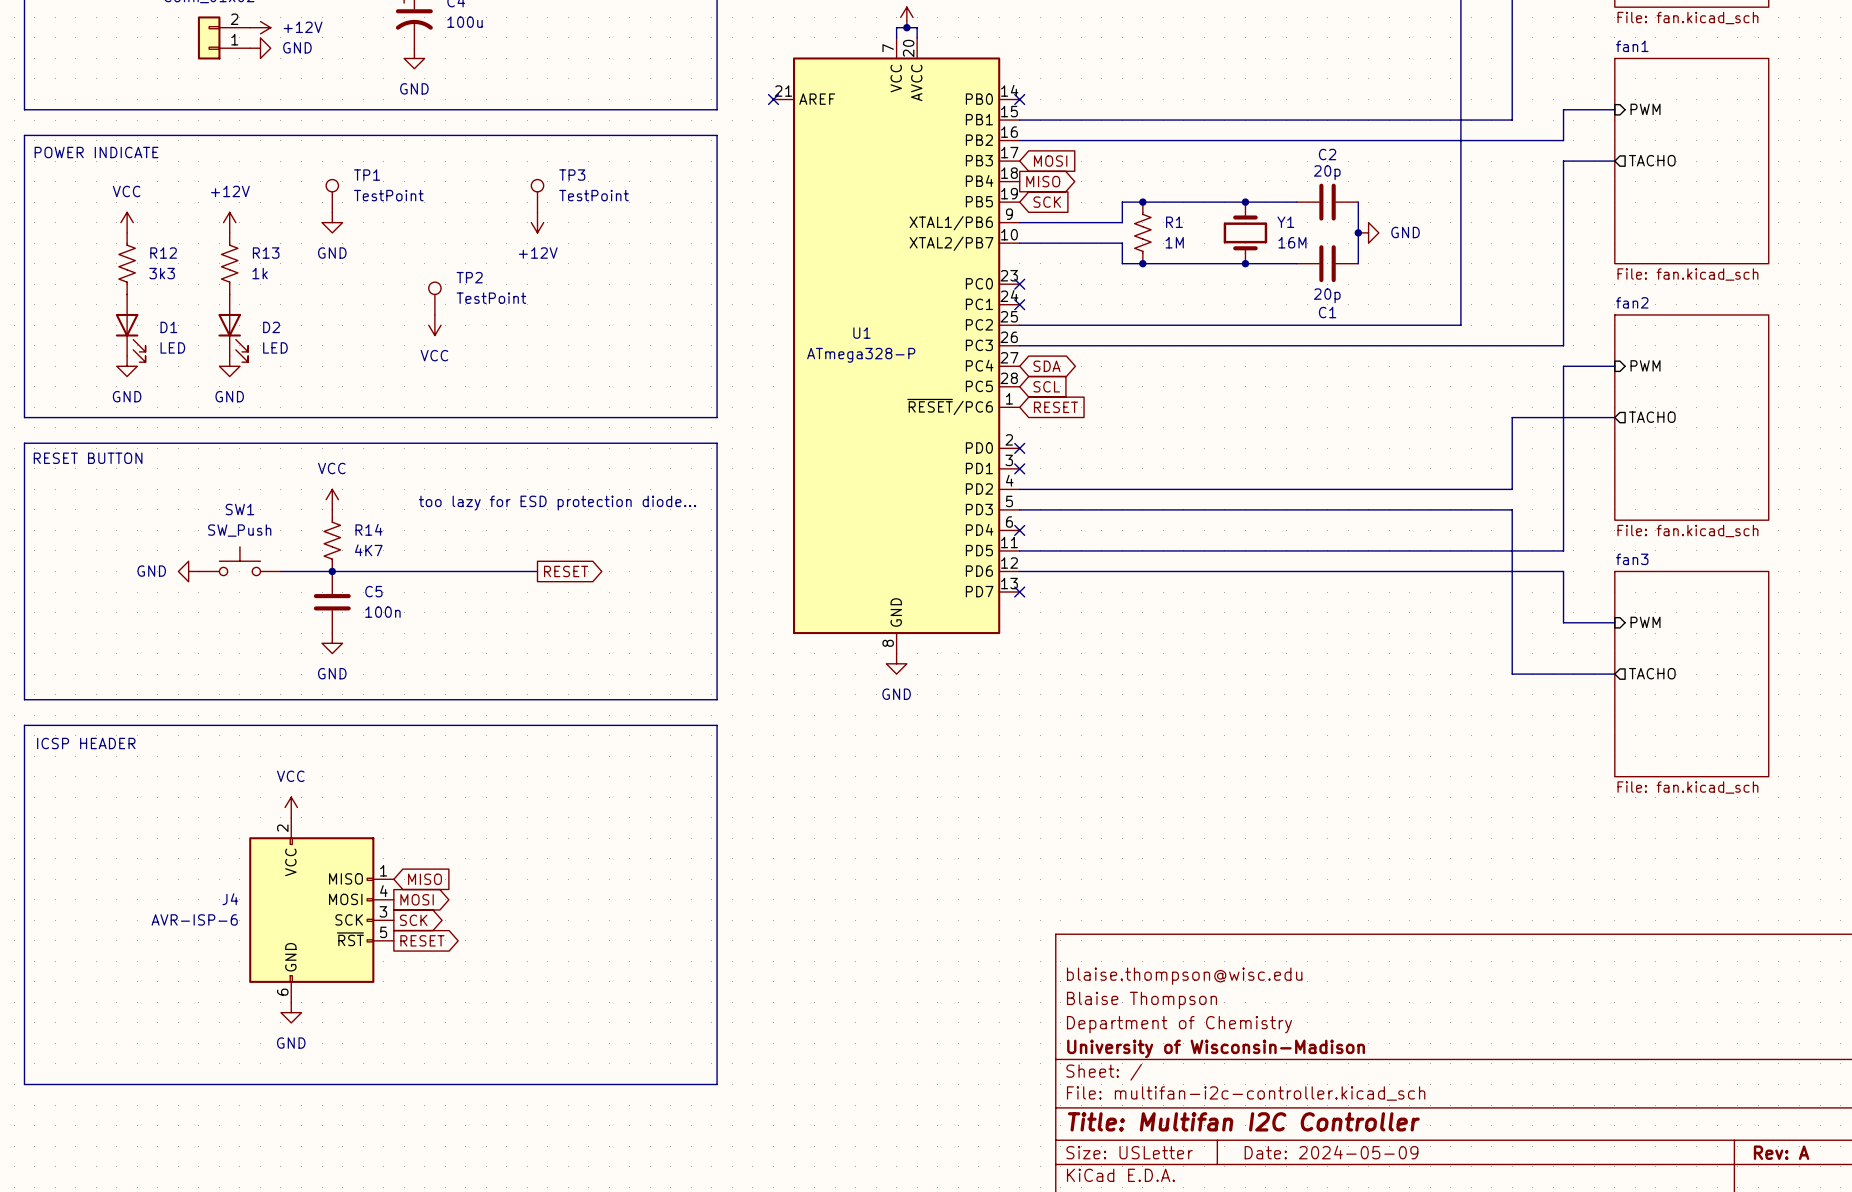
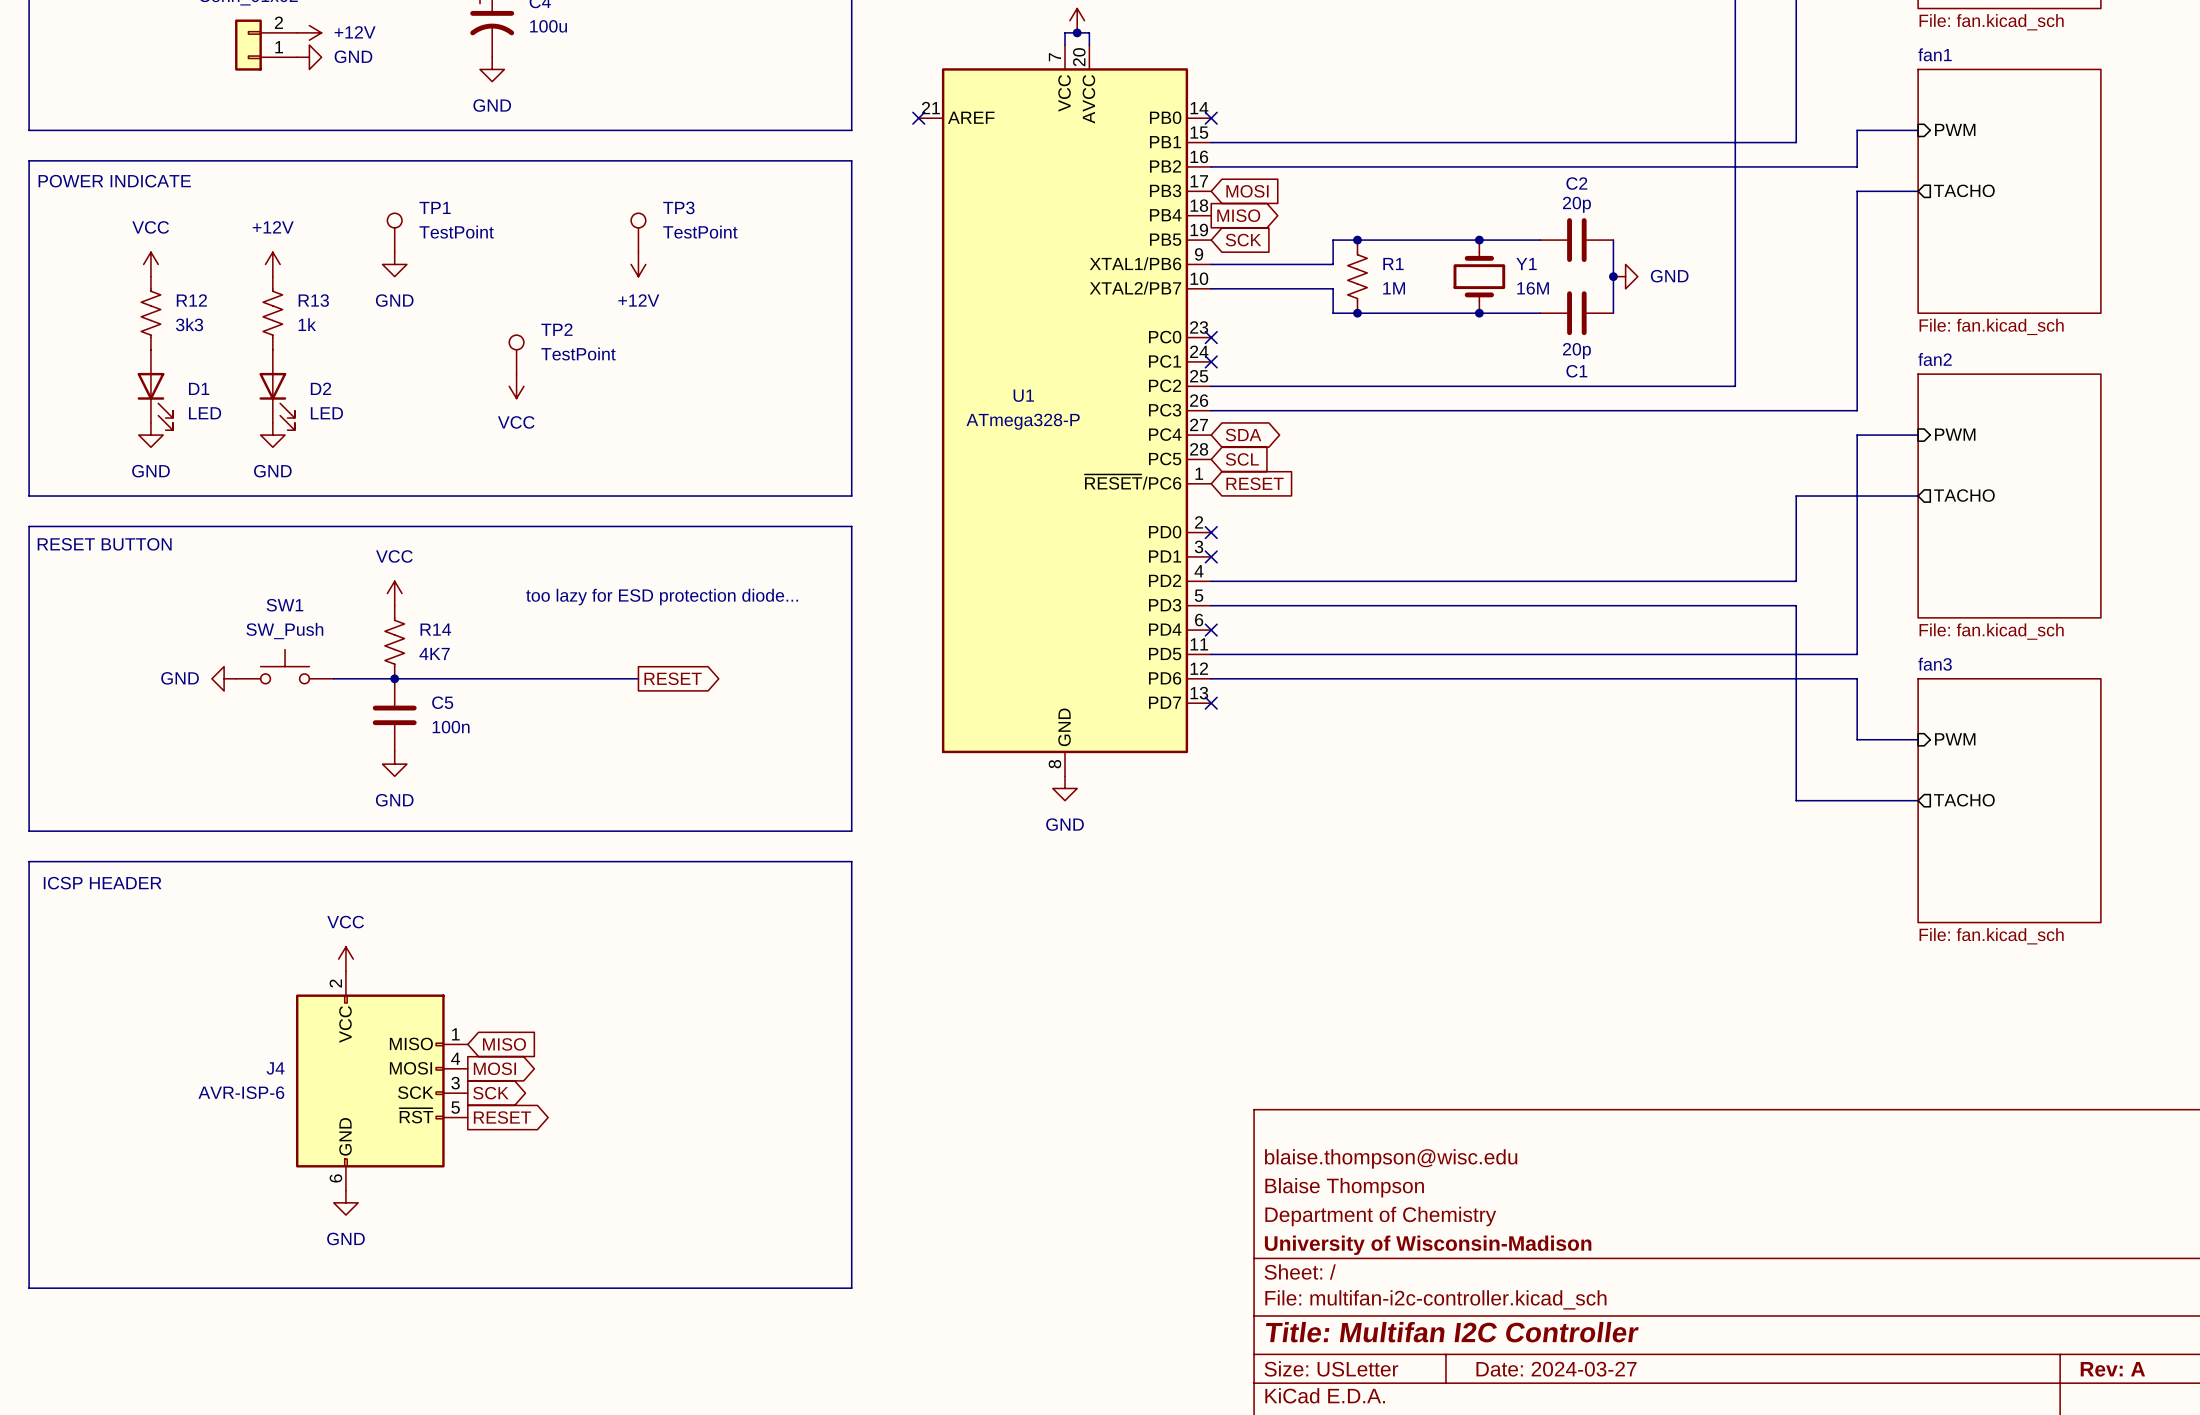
title block: Date: 2024-05-09 (1331, 1152) -> Date: 2024-03-27 (1556, 1369)

